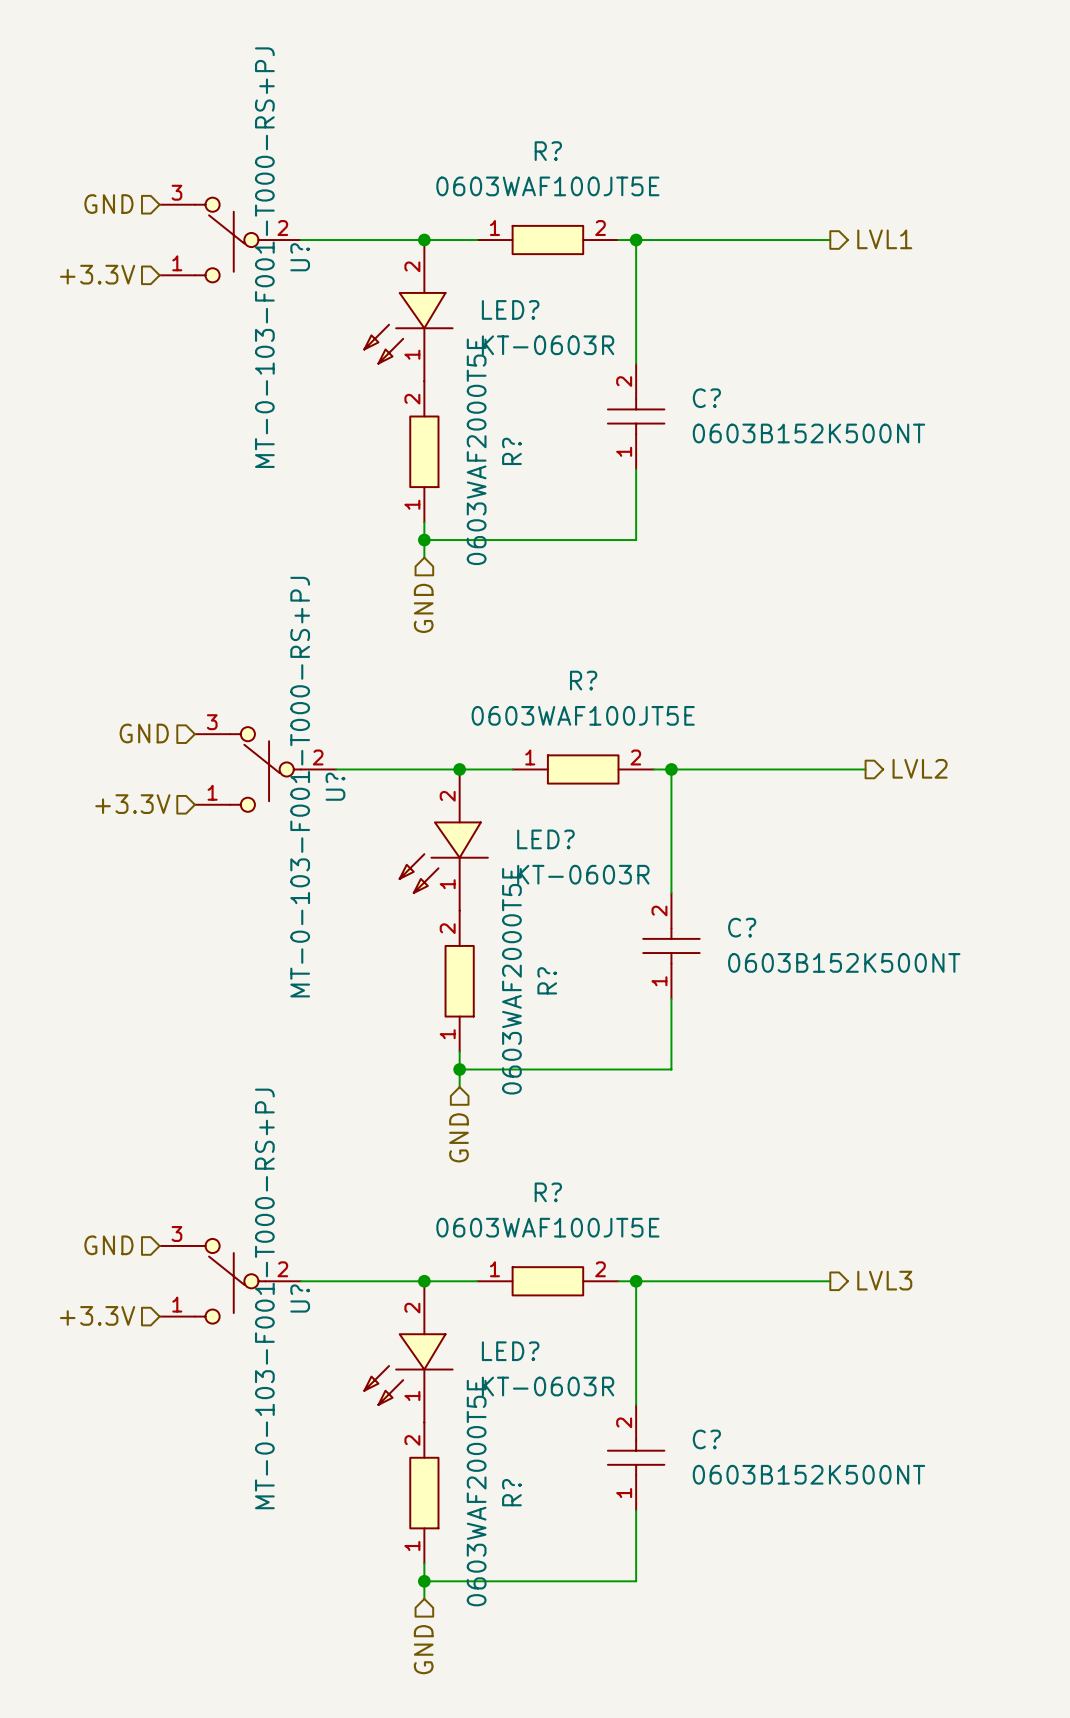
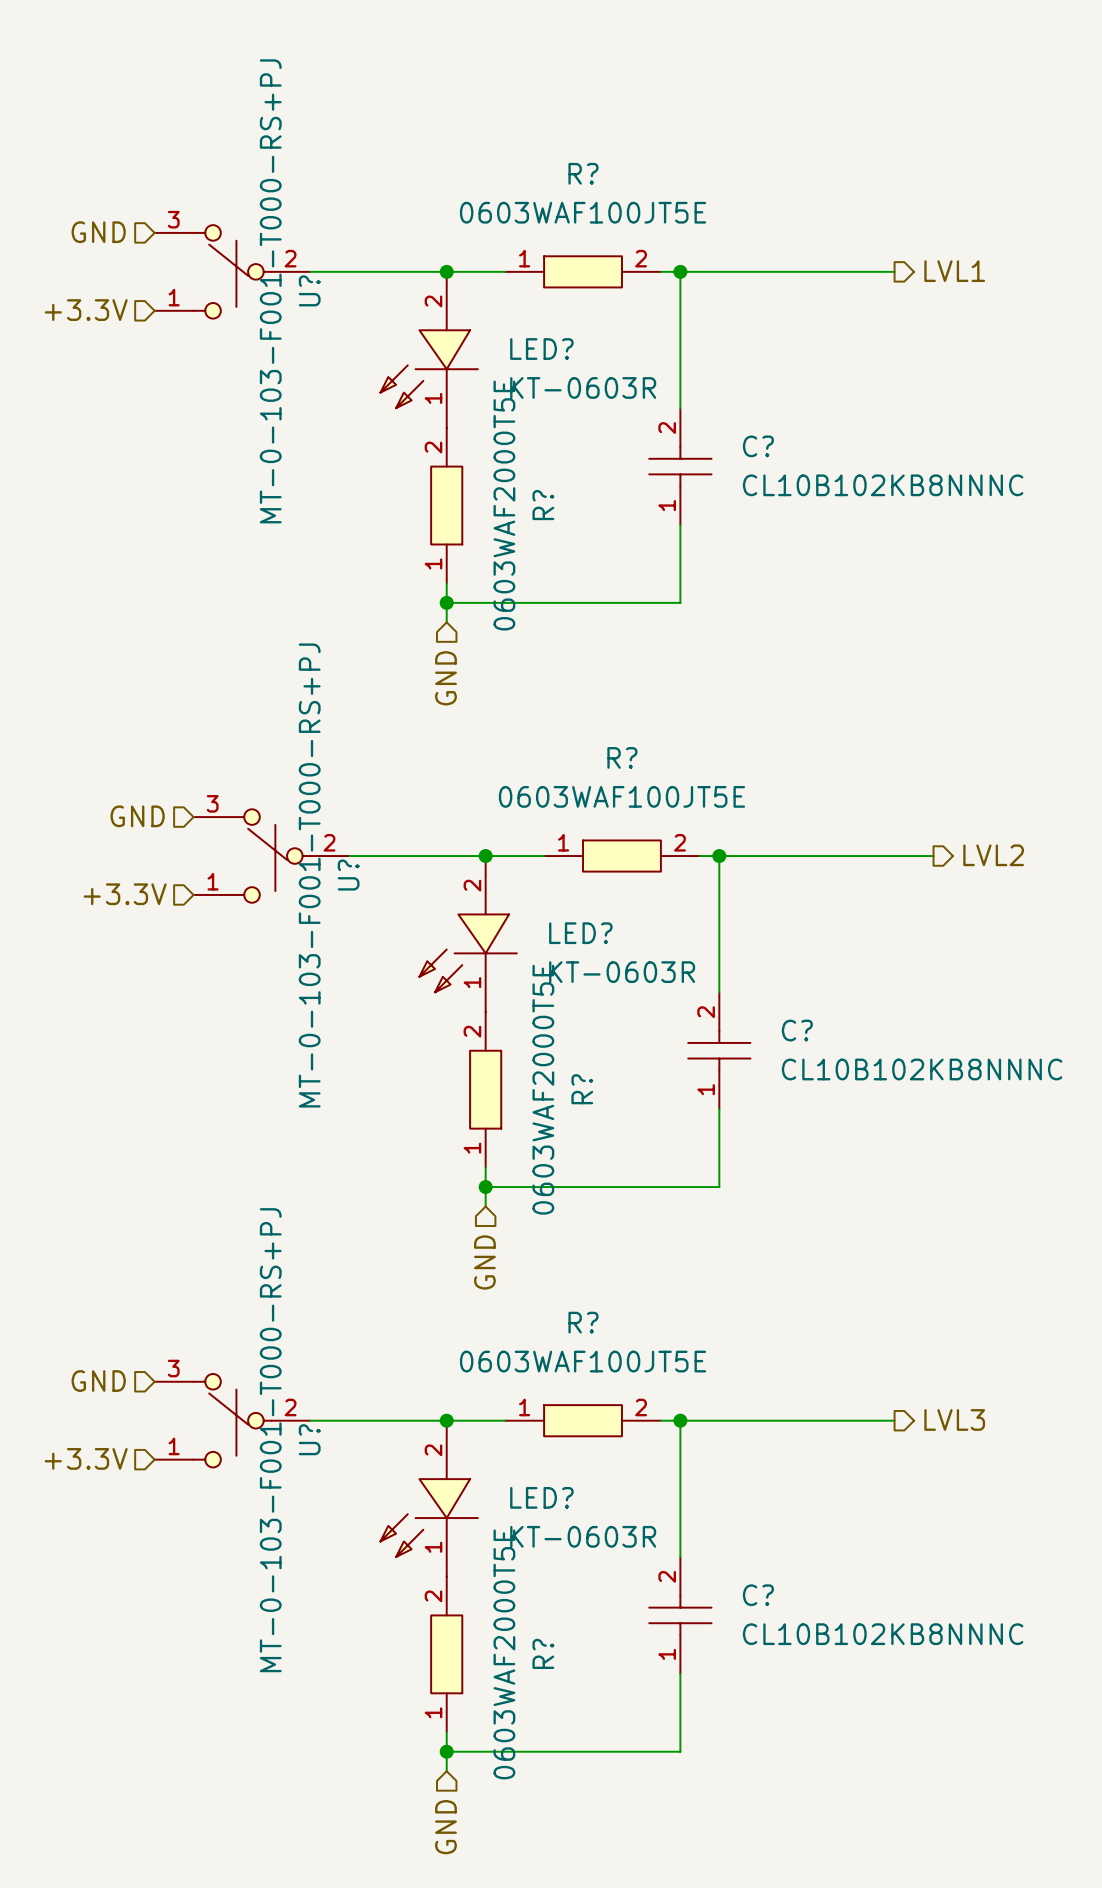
C? value: 0603B152K500NT (808, 433) -> CL10B102KB8NNNC (883, 485)
C? value: 0603B152K500NT (844, 962) -> CL10B102KB8NNNC (922, 1069)
C? value: 0603B152K500NT (808, 1474) -> CL10B102KB8NNNC (883, 1634)

